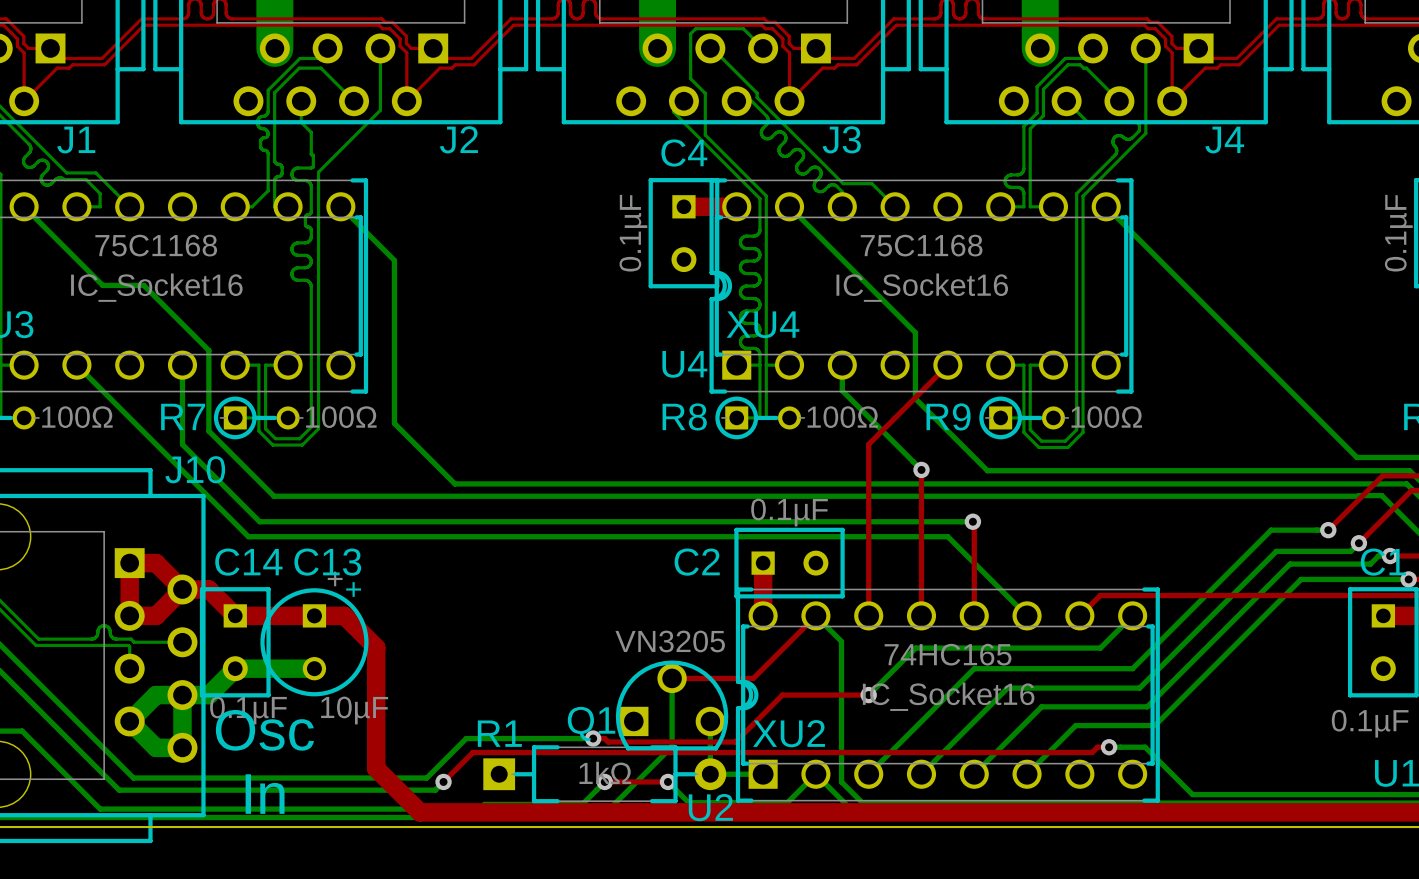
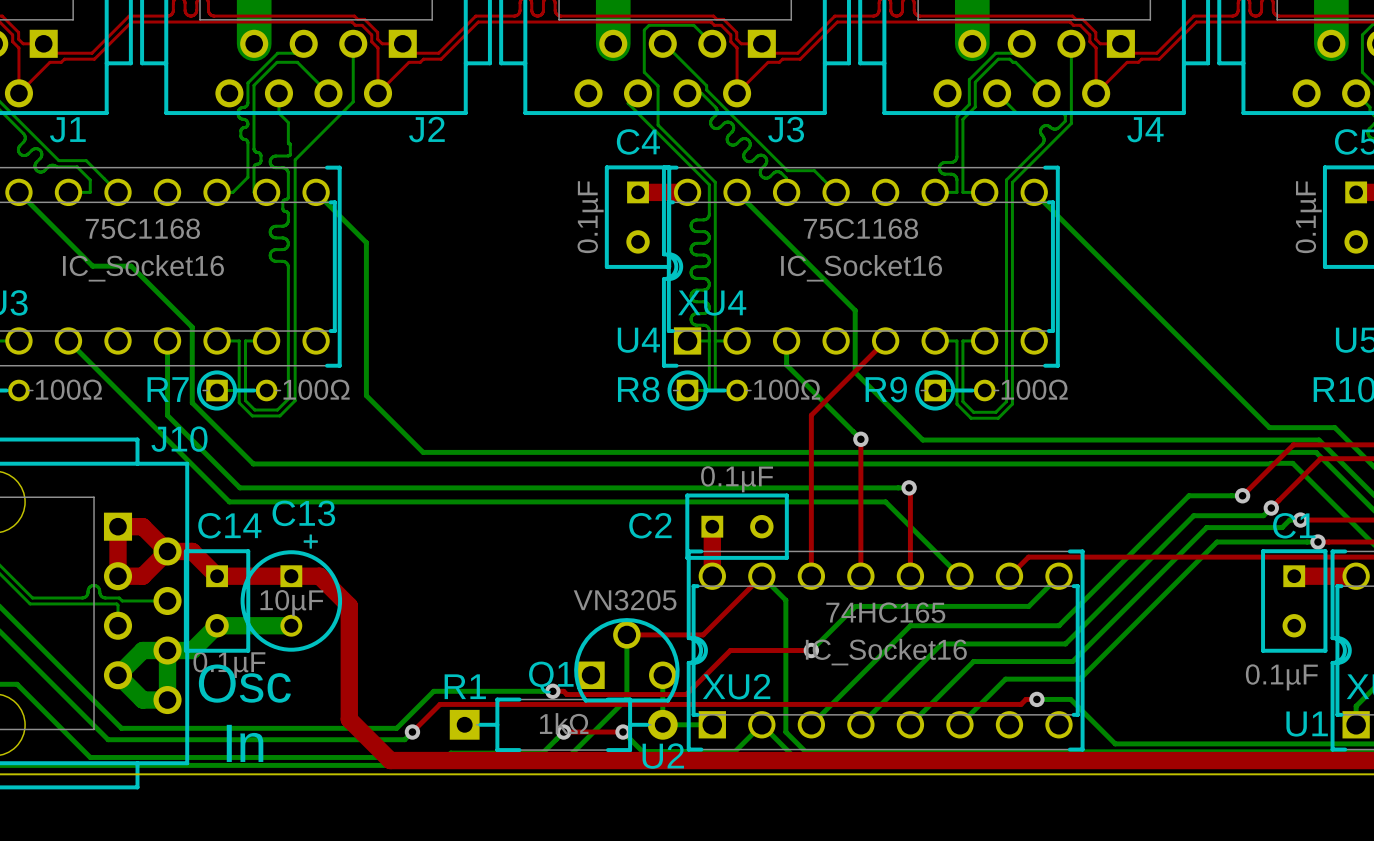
C13 footprint: [260, 588, 369, 697] -> [240, 550, 343, 652]
C13 value position: 10µF (354, 710) -> 10µF (291, 603)

